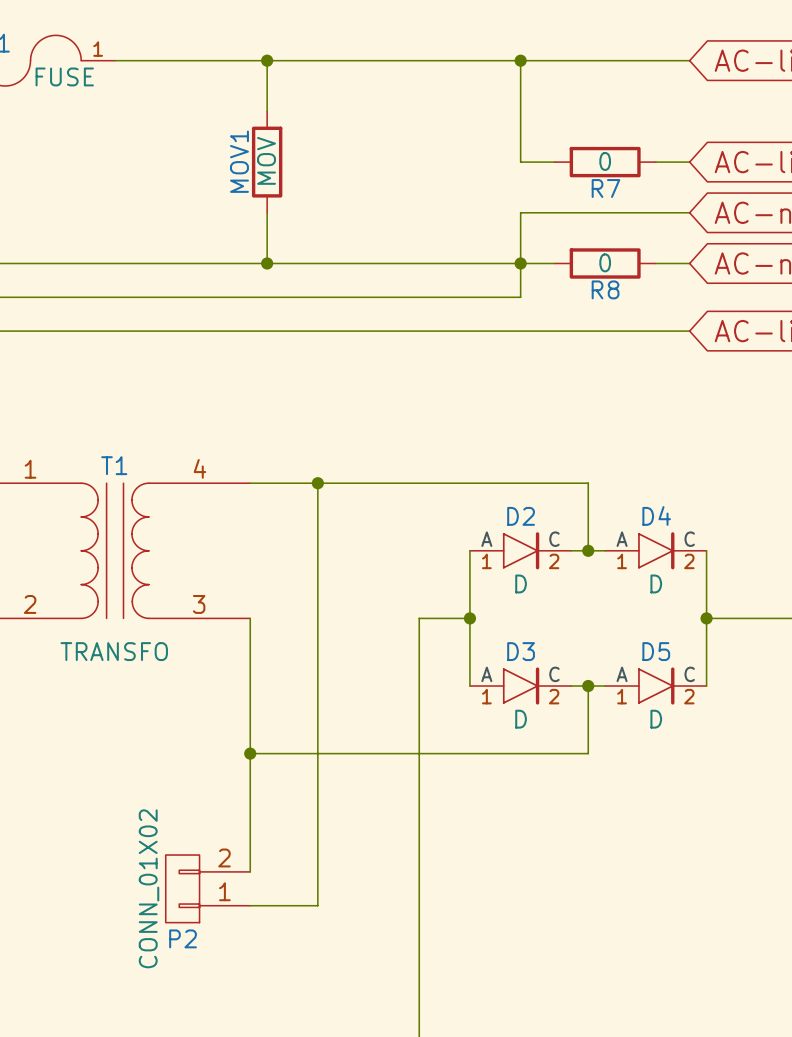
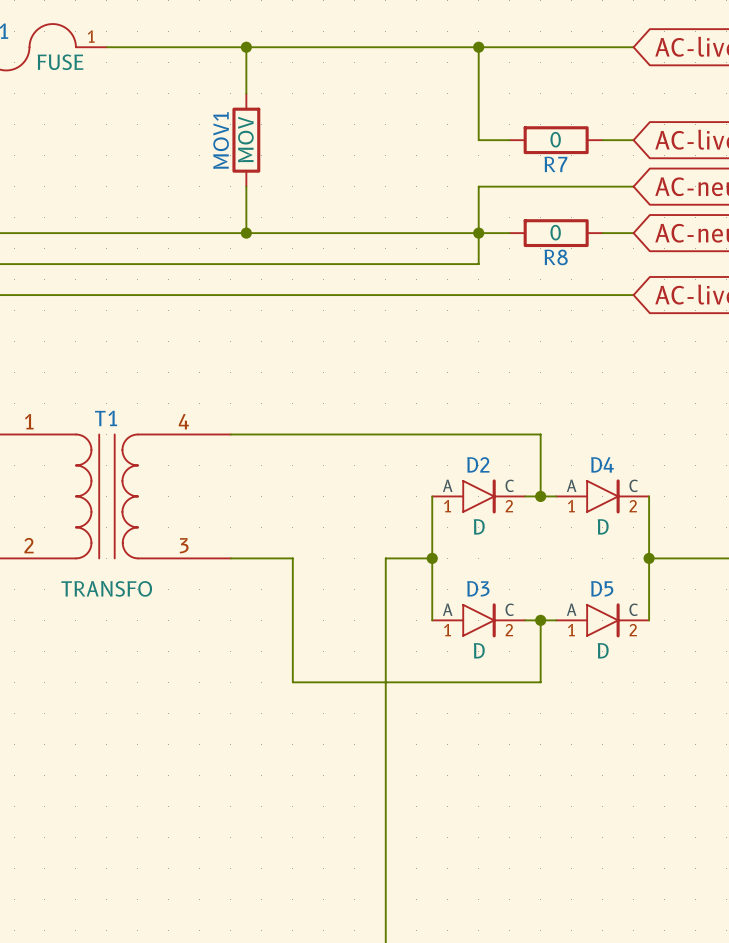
wire: (317, 483) (317, 618) -> (230, 558) (292, 558)
junction: (317, 483) -> none
wire: (250, 618) (250, 871) -> none
wire: (250, 753) (317, 753) (317, 905) (250, 905) -> none
junction: (250, 753) -> none
P2: CONN_01X02 (207, 888) -> none

